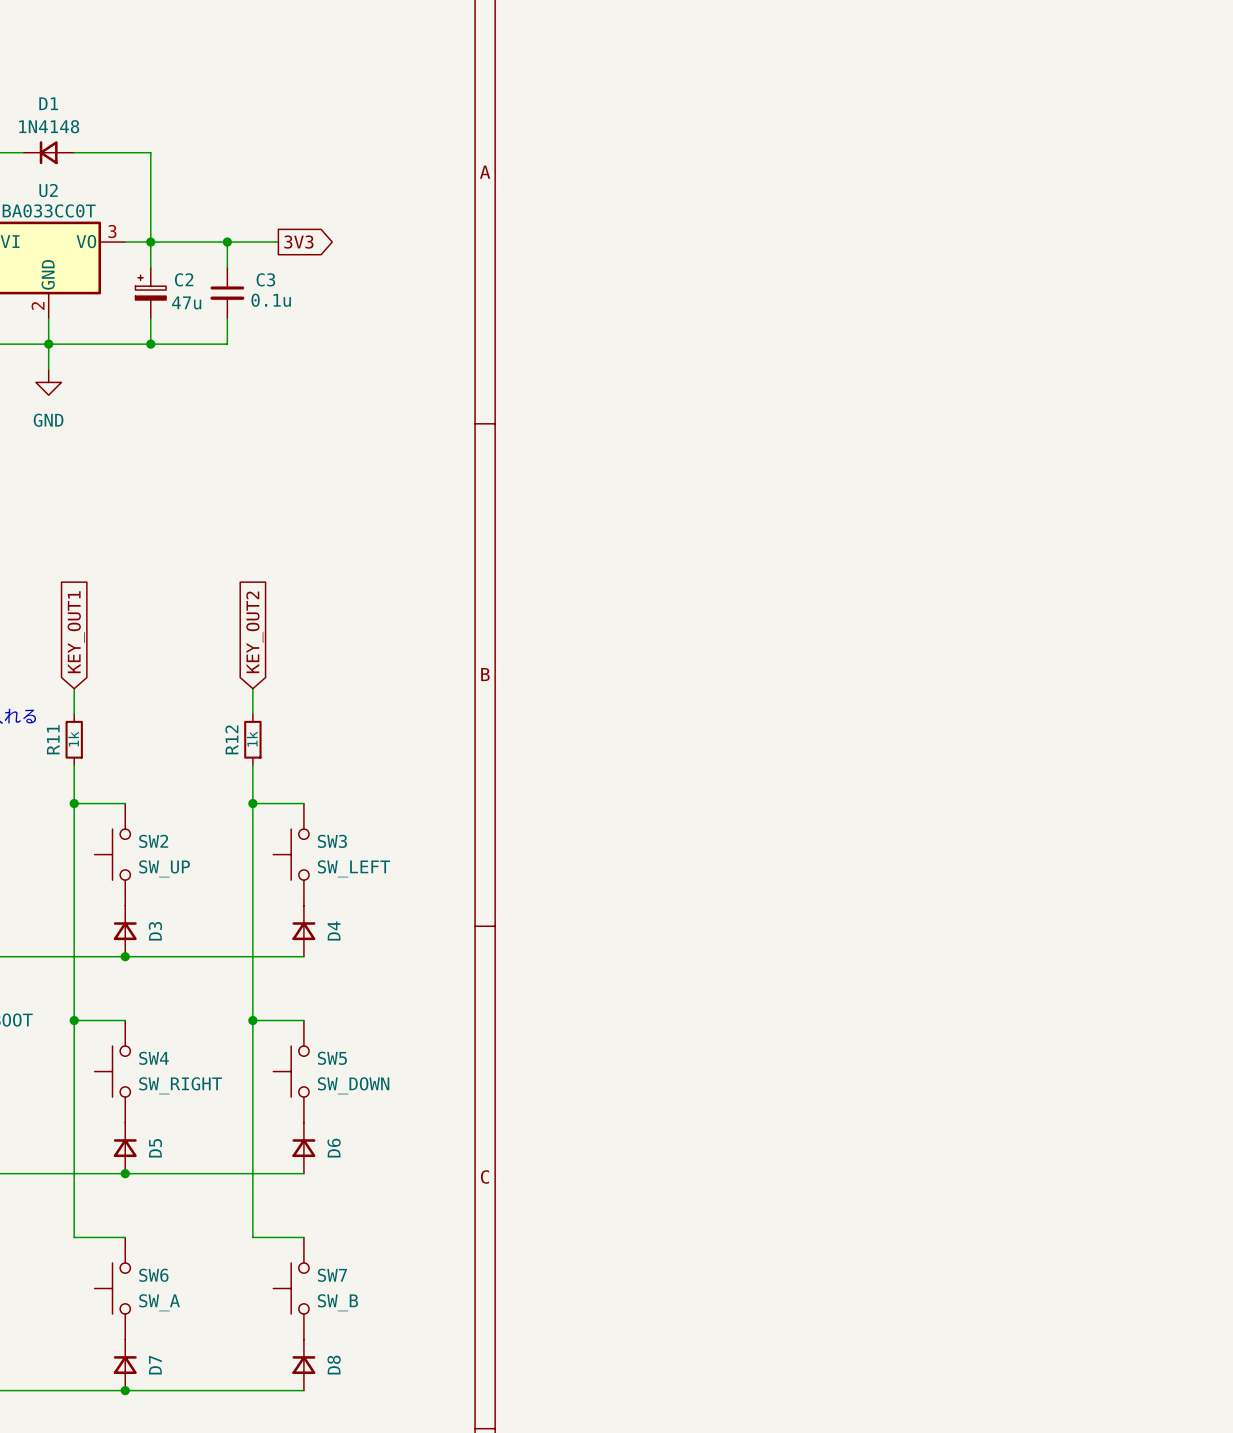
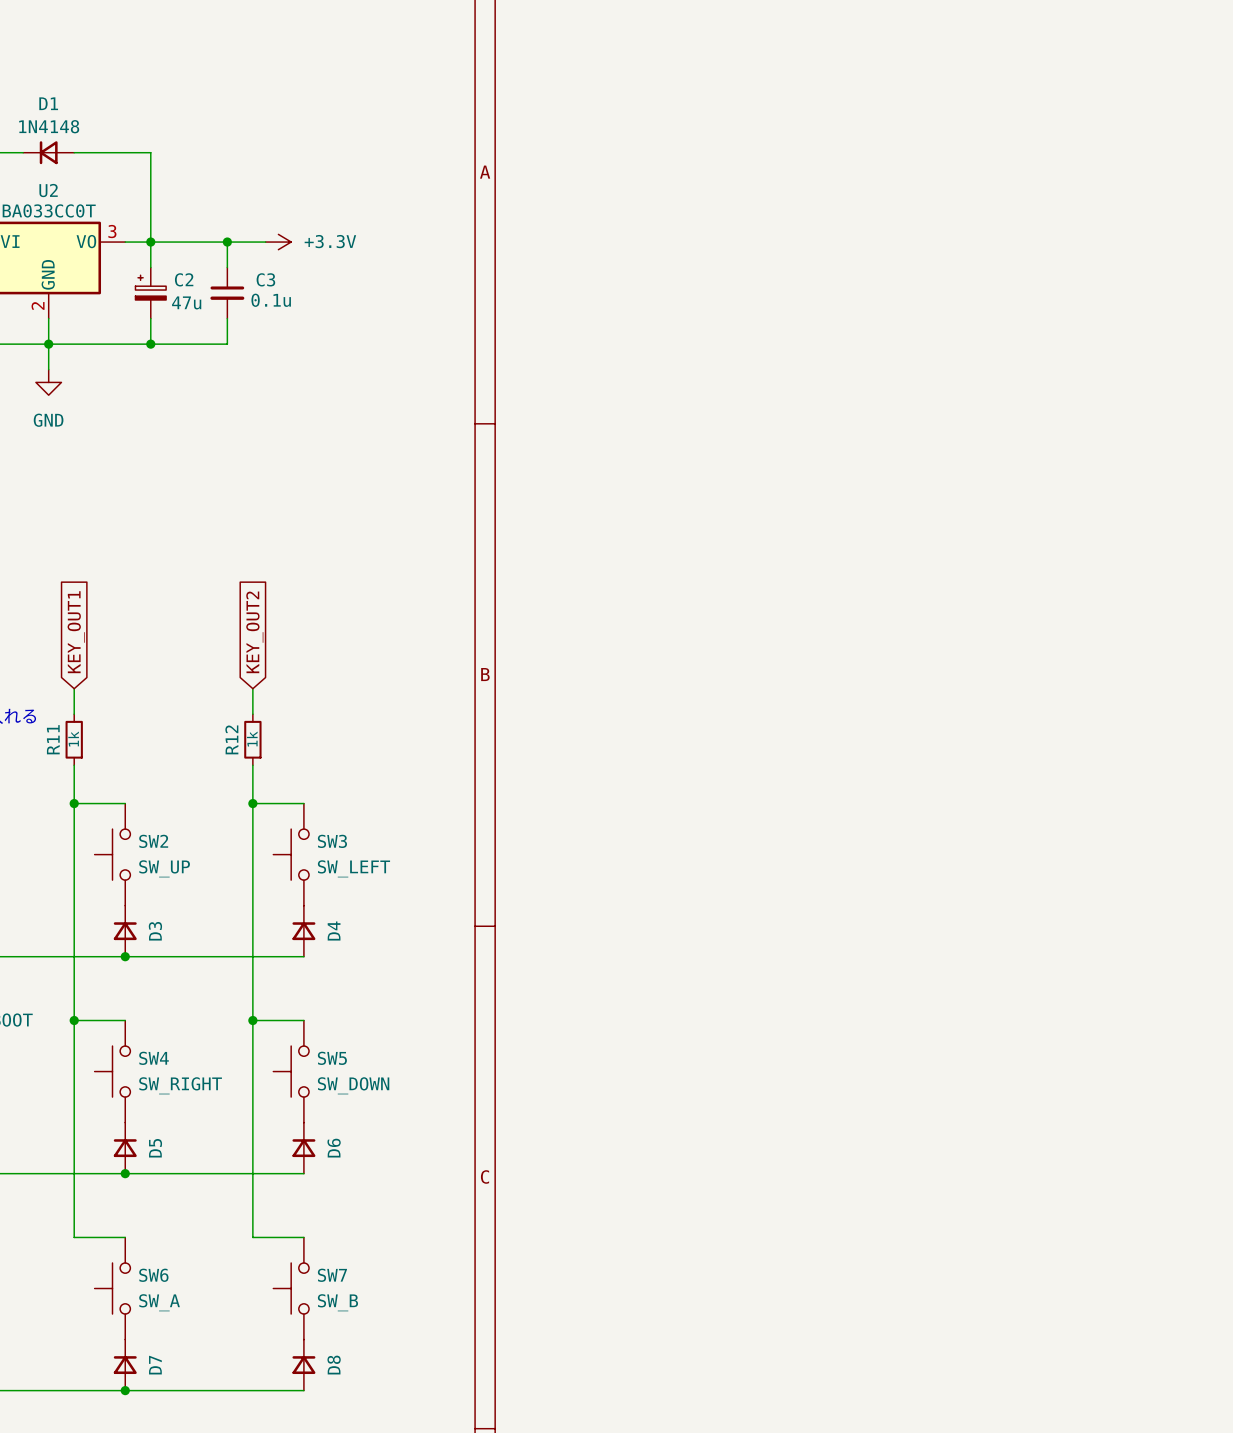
power symbol: none -> +3.3V (278, 242)
global label: 3V3 (298, 242) -> none

